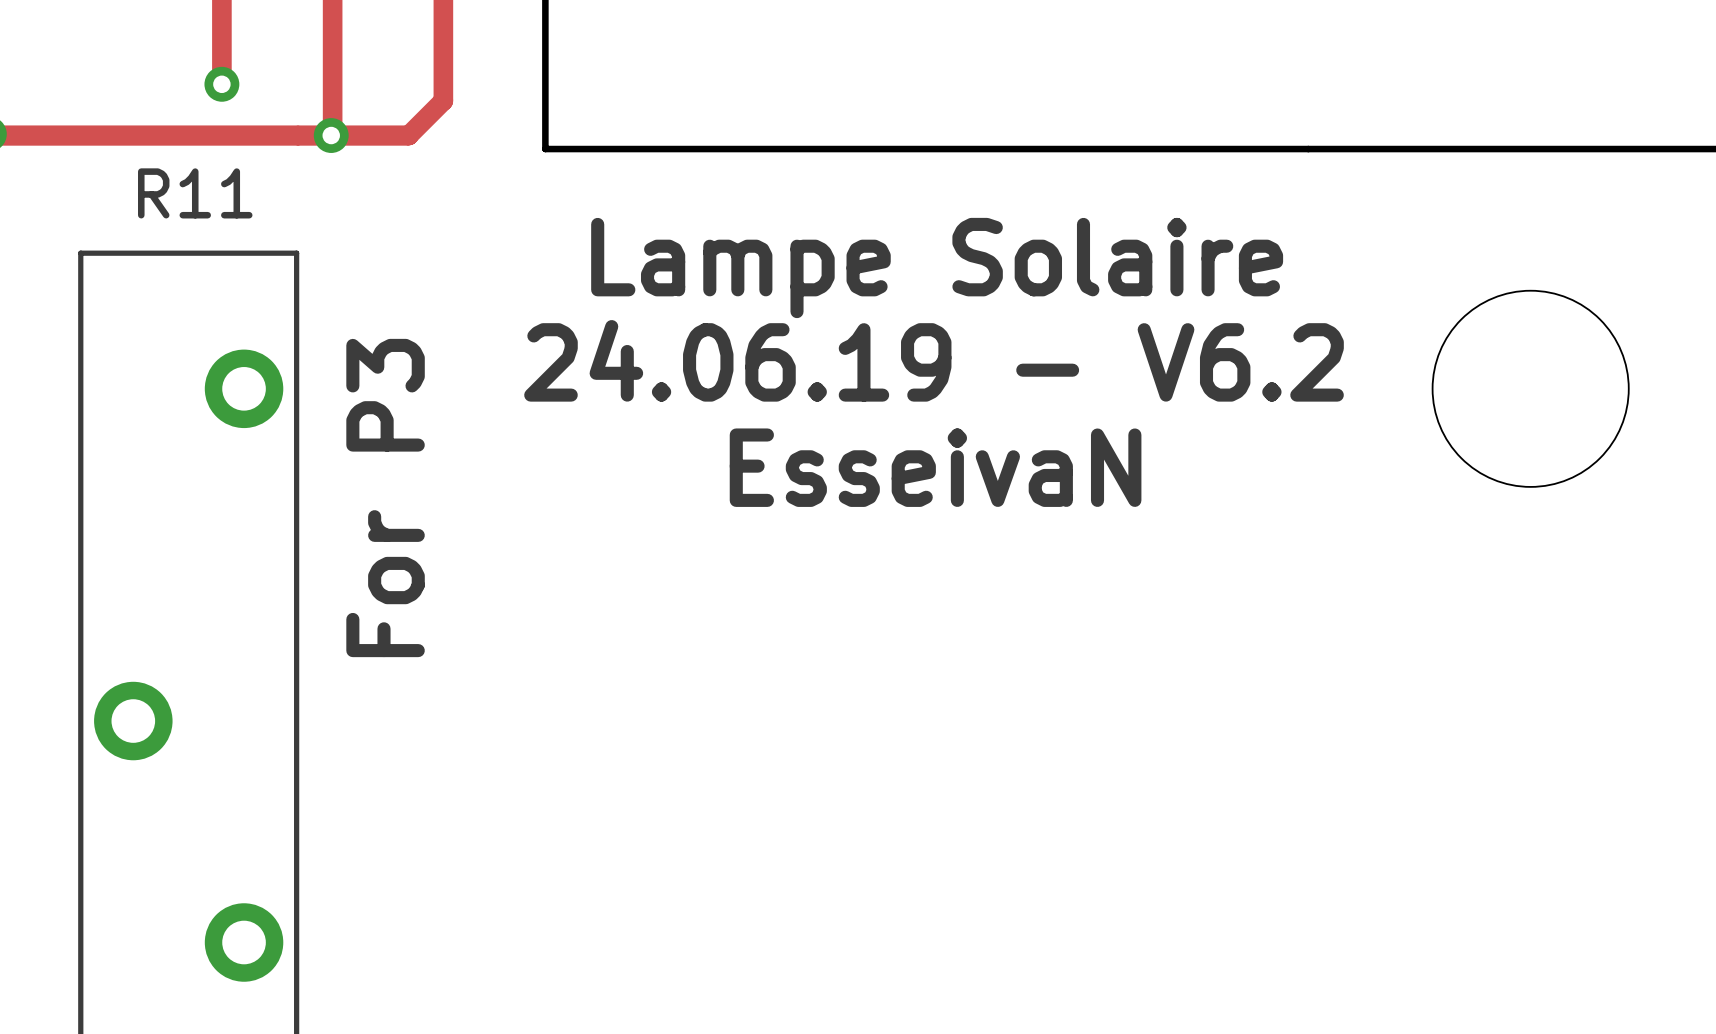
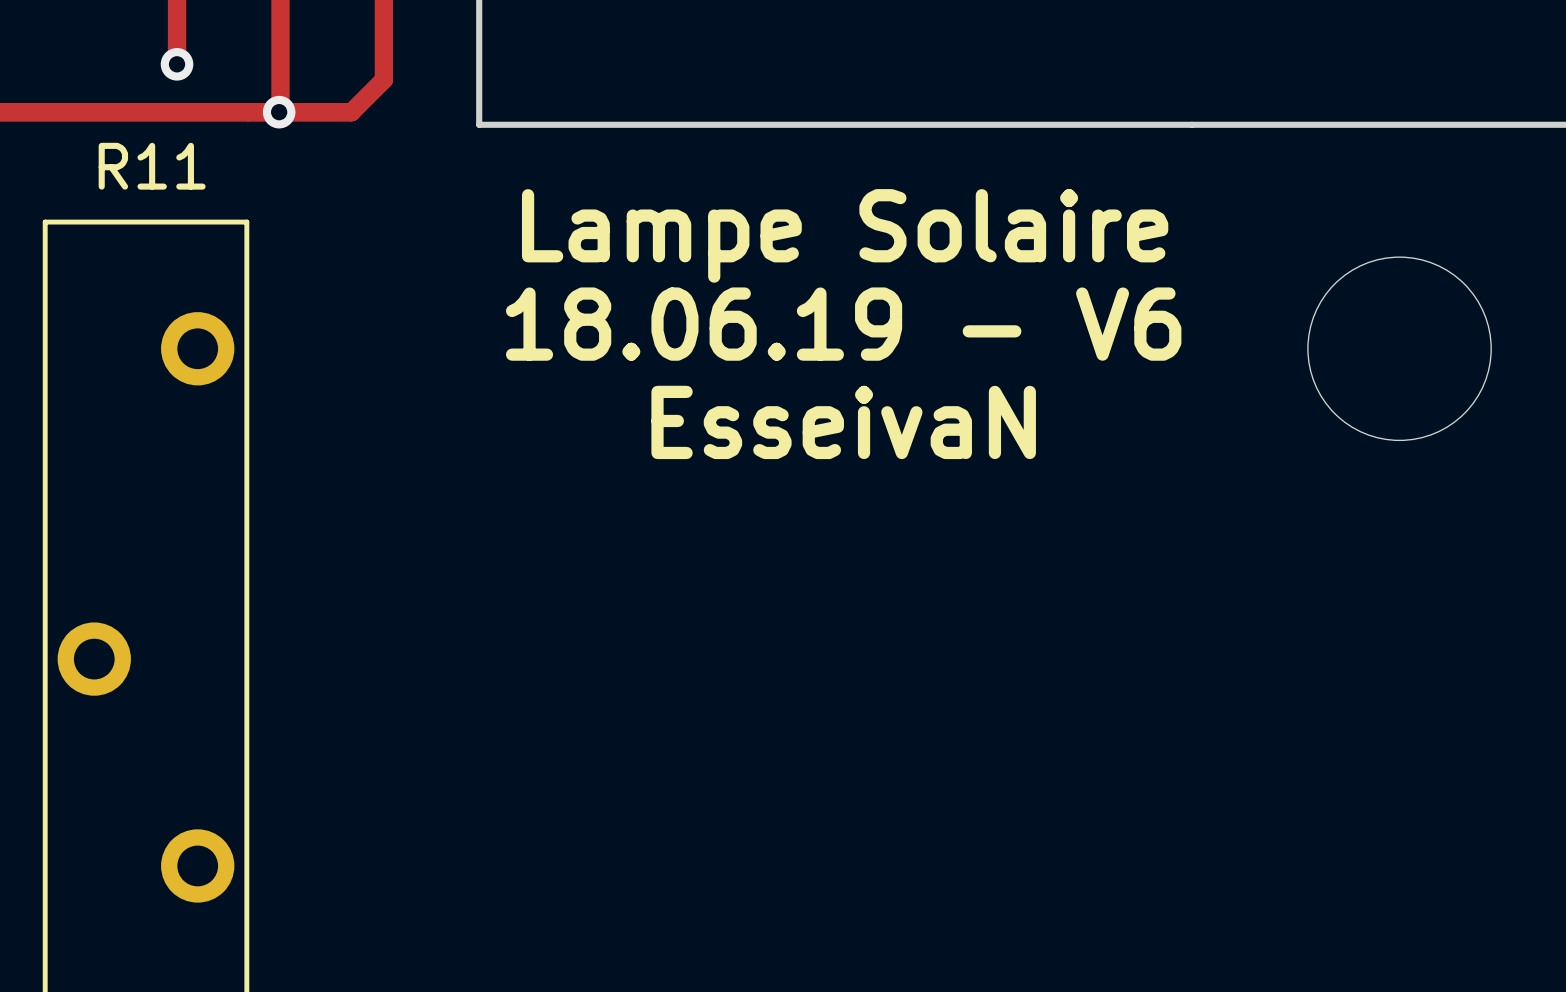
text: 24.06.19 - V6.2 (934, 360) -> 18.06.19 - V6 (843, 324)
text: For P3 (385, 498) -> none

